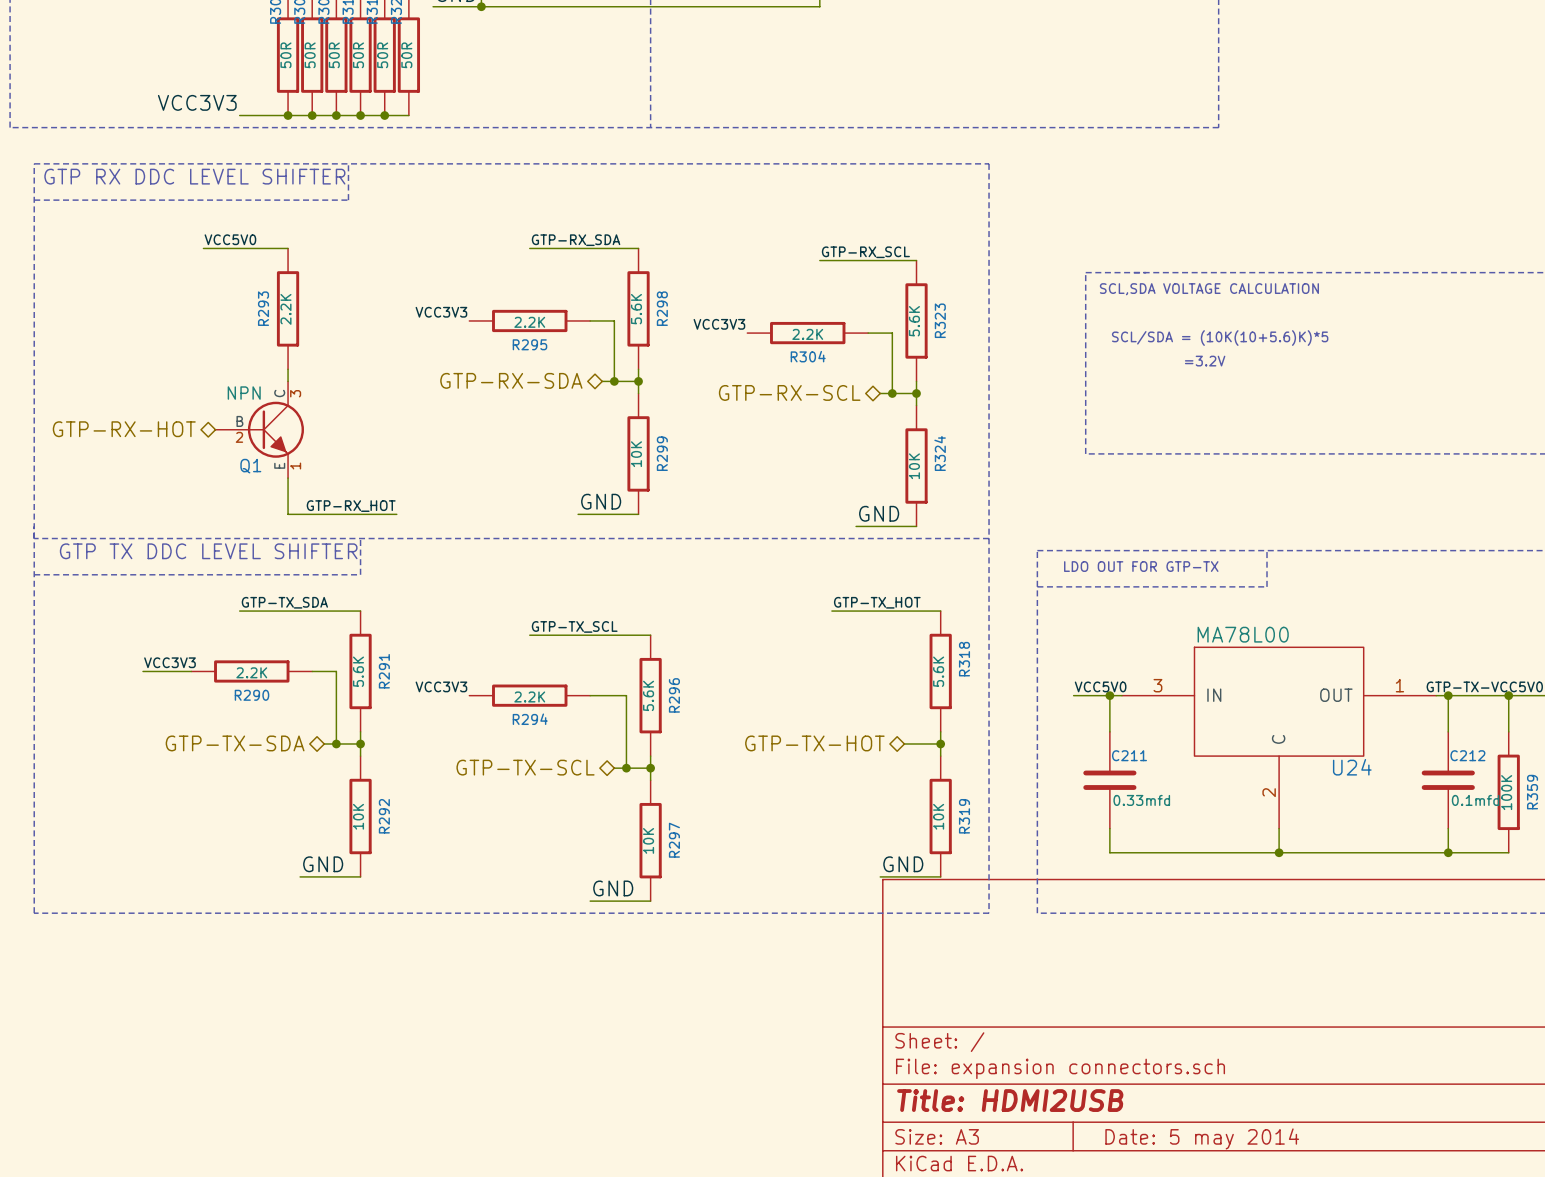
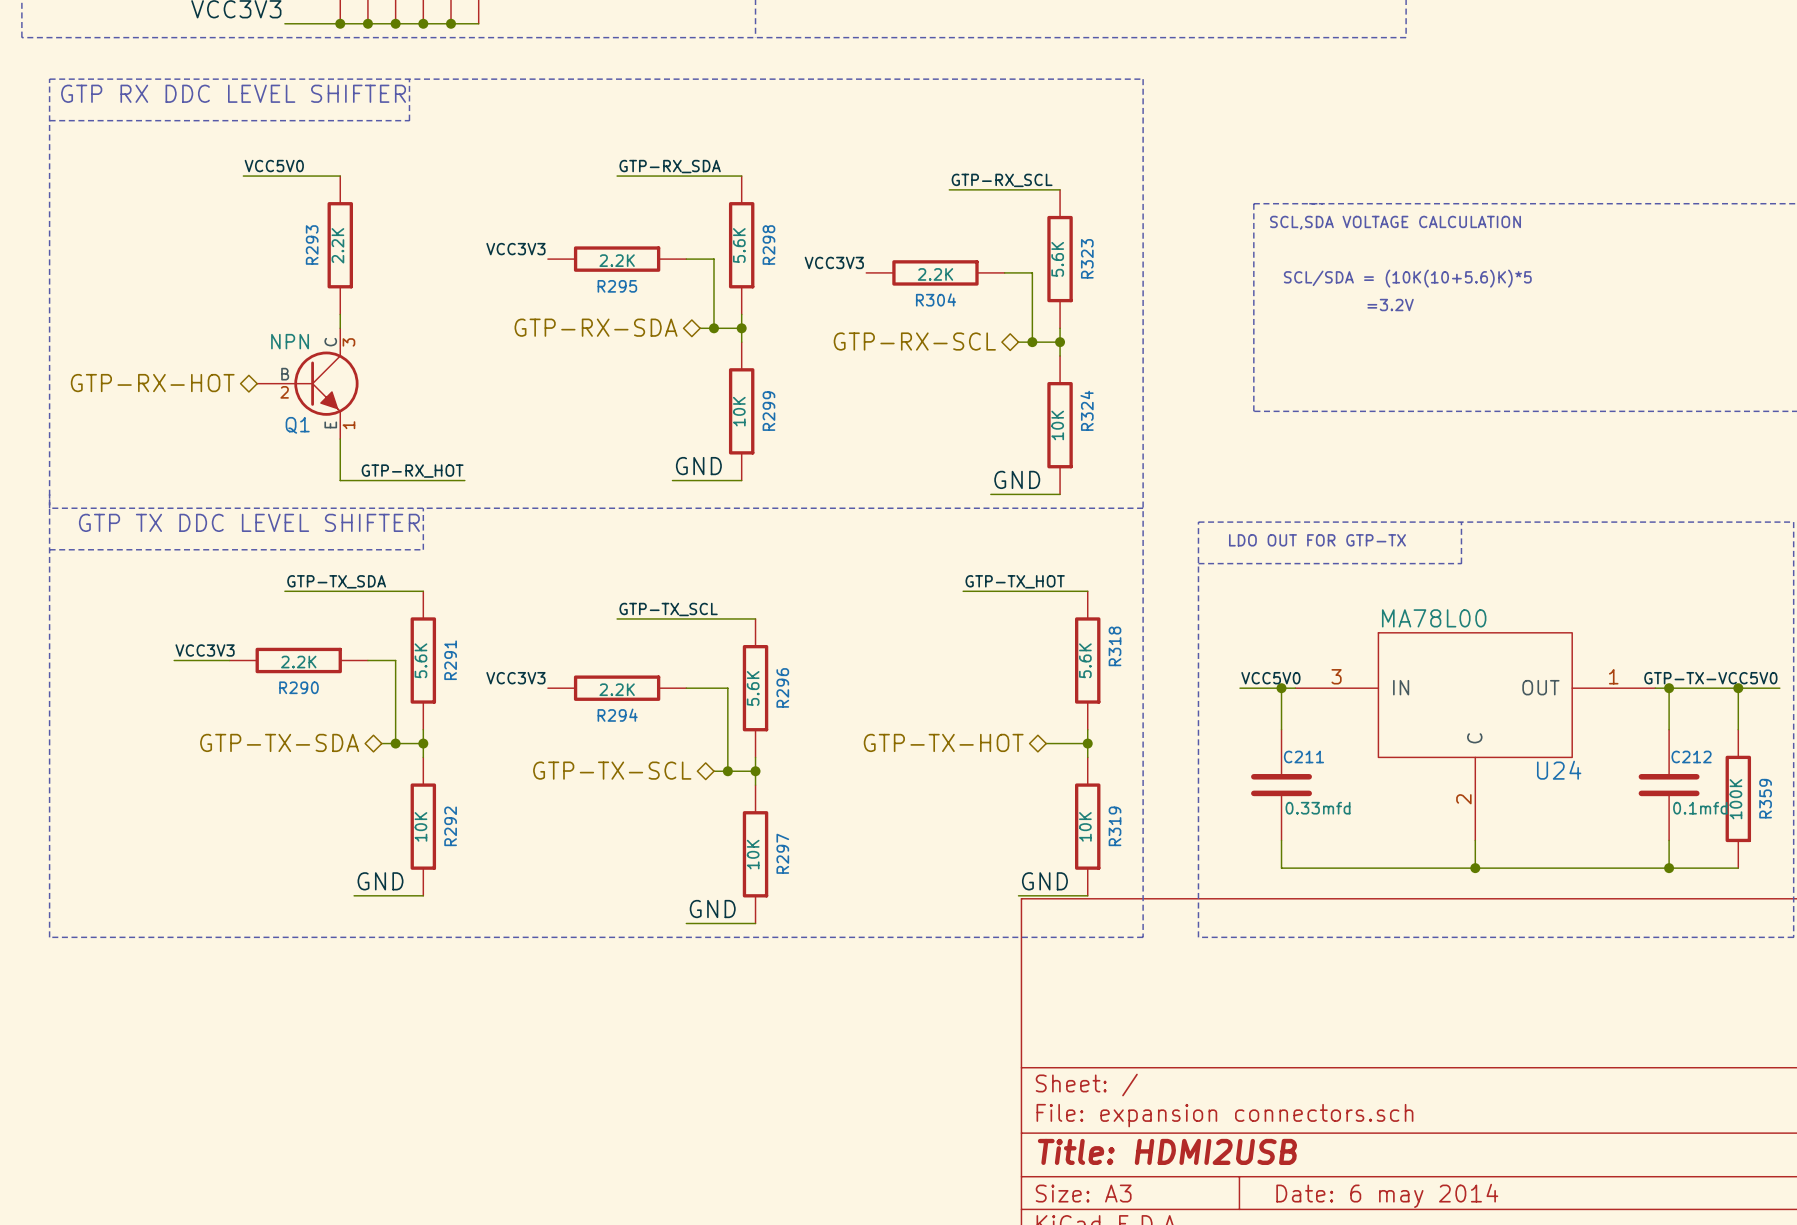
title block: Date: 5 may 2014 (1202, 1138) -> Date: 6 may 2014 (1387, 1195)

